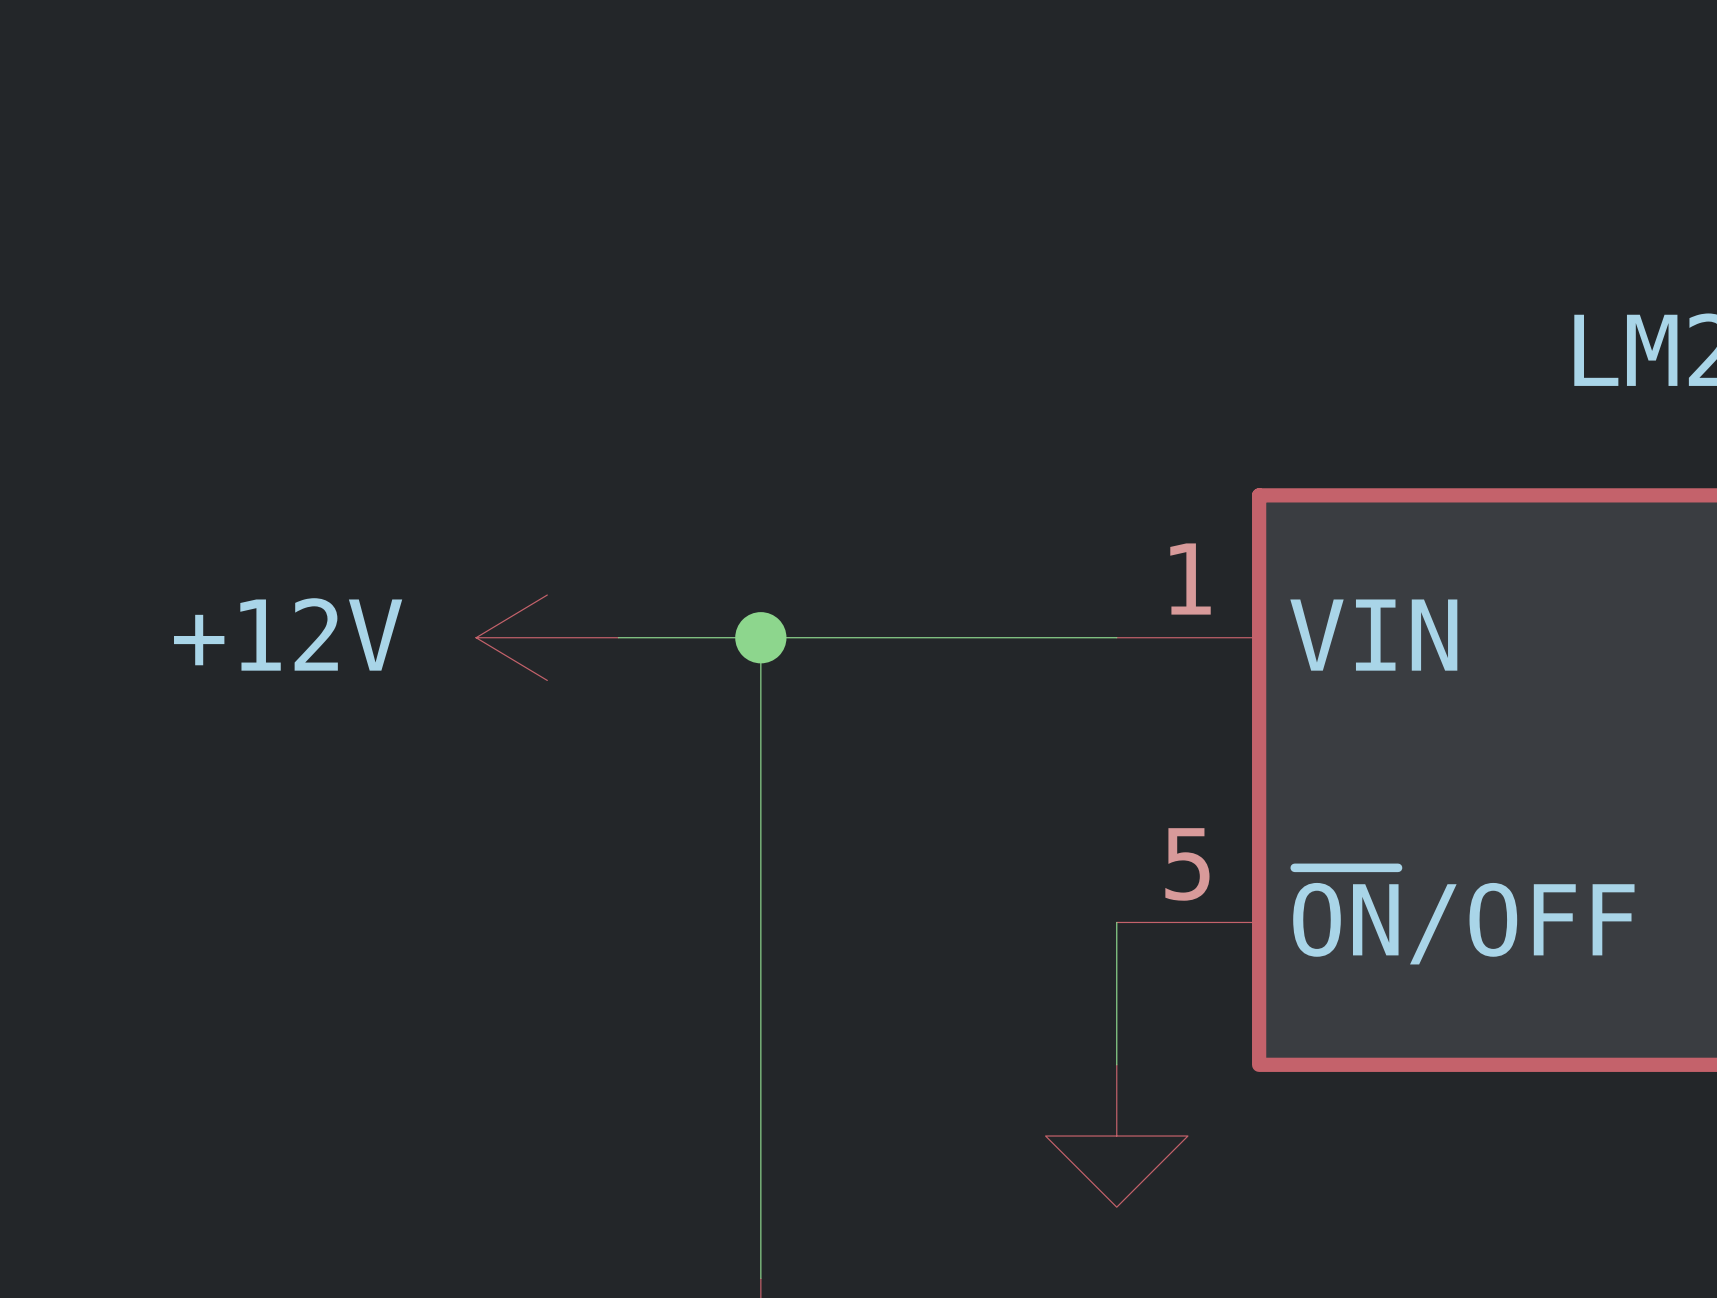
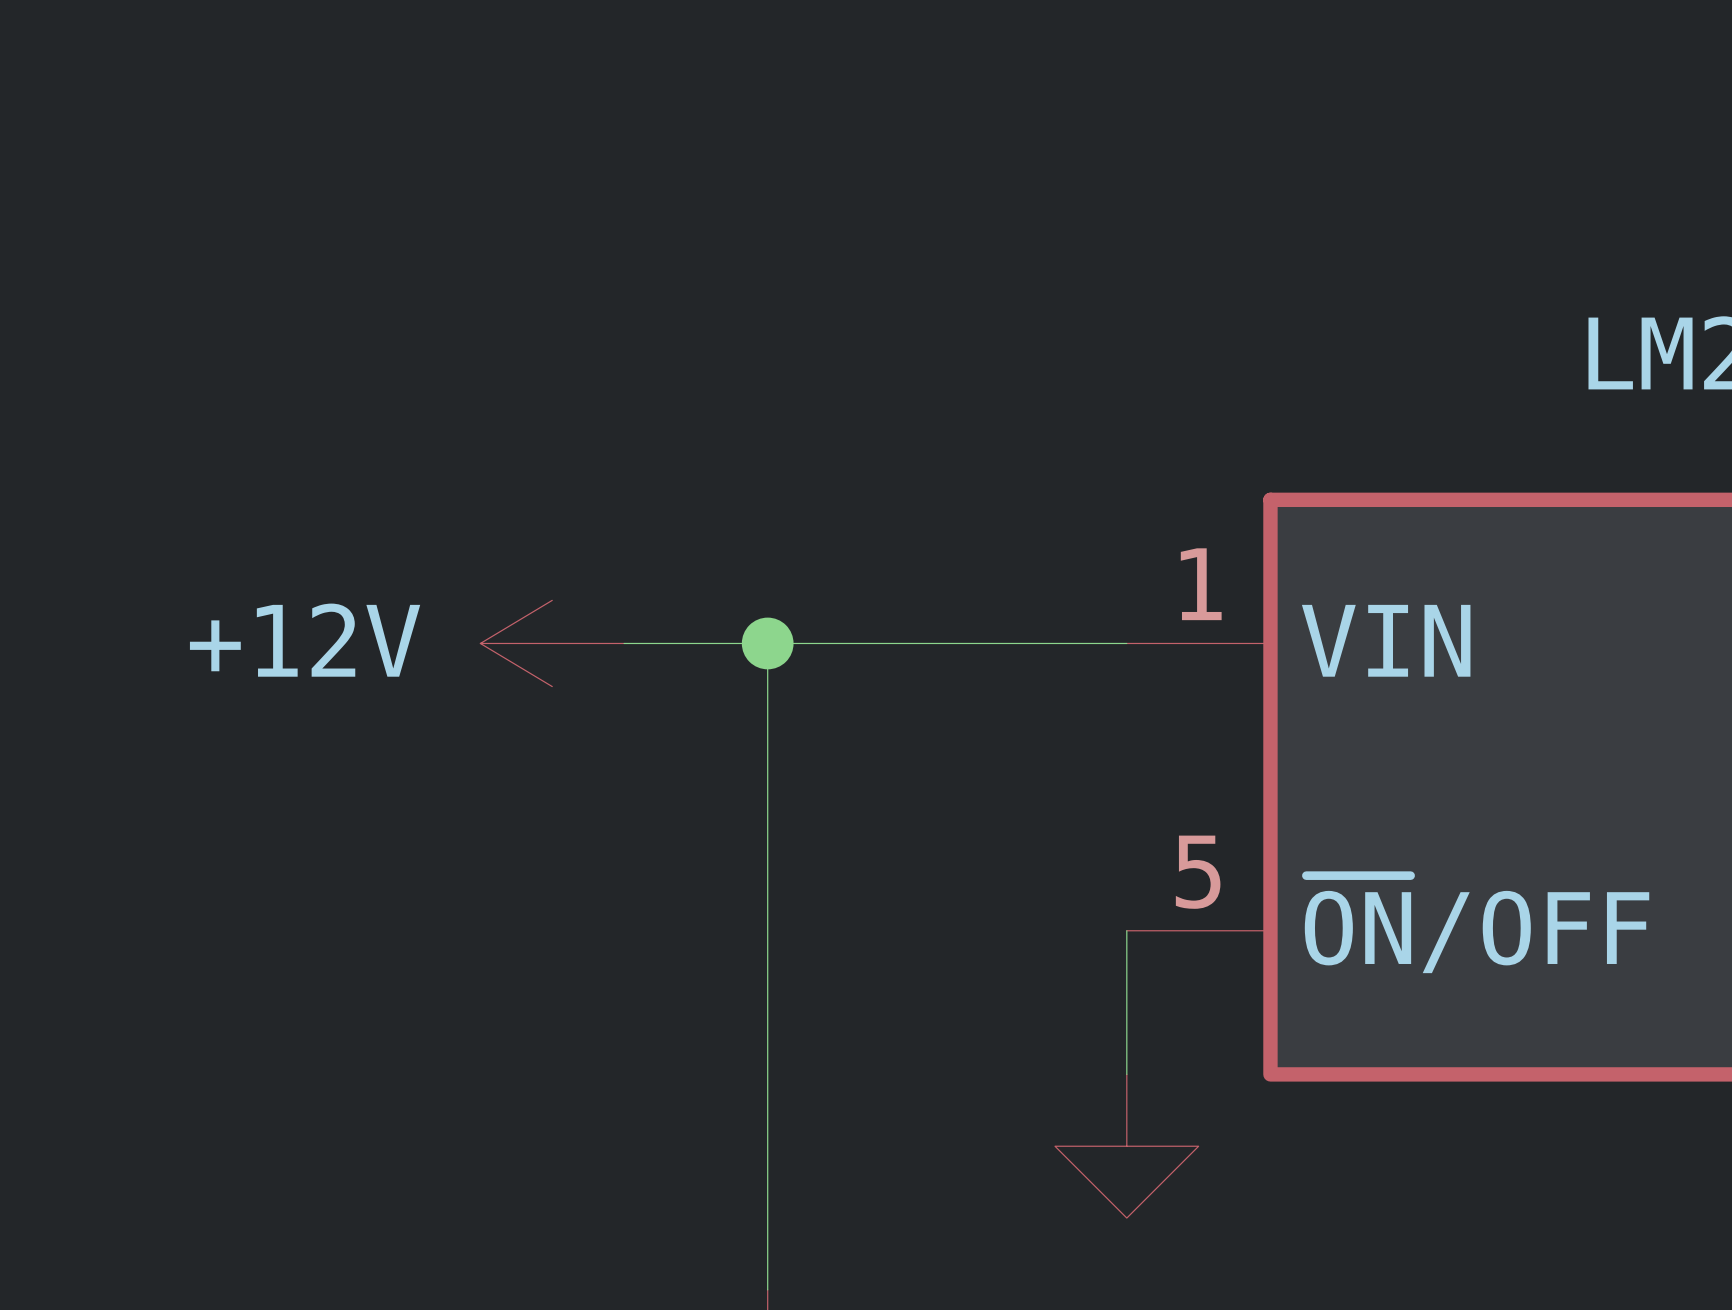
power symbol text position: +12V (288, 634) -> +12V (305, 640)

